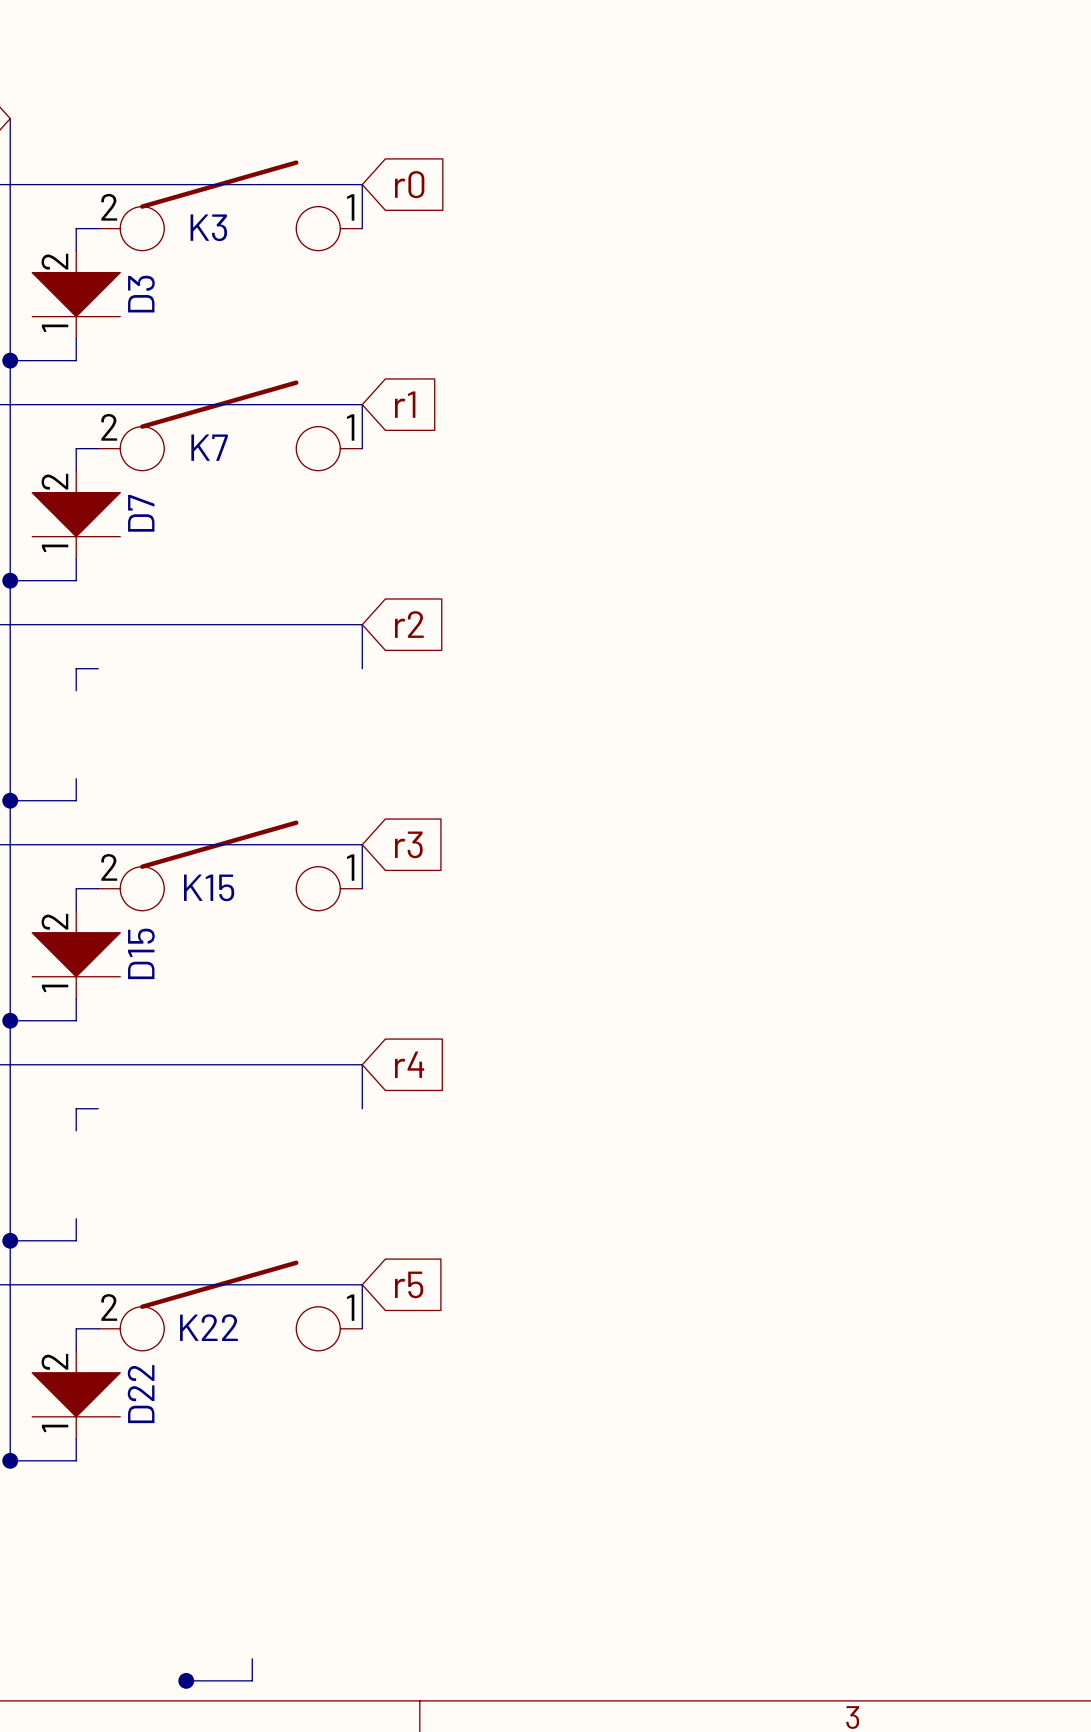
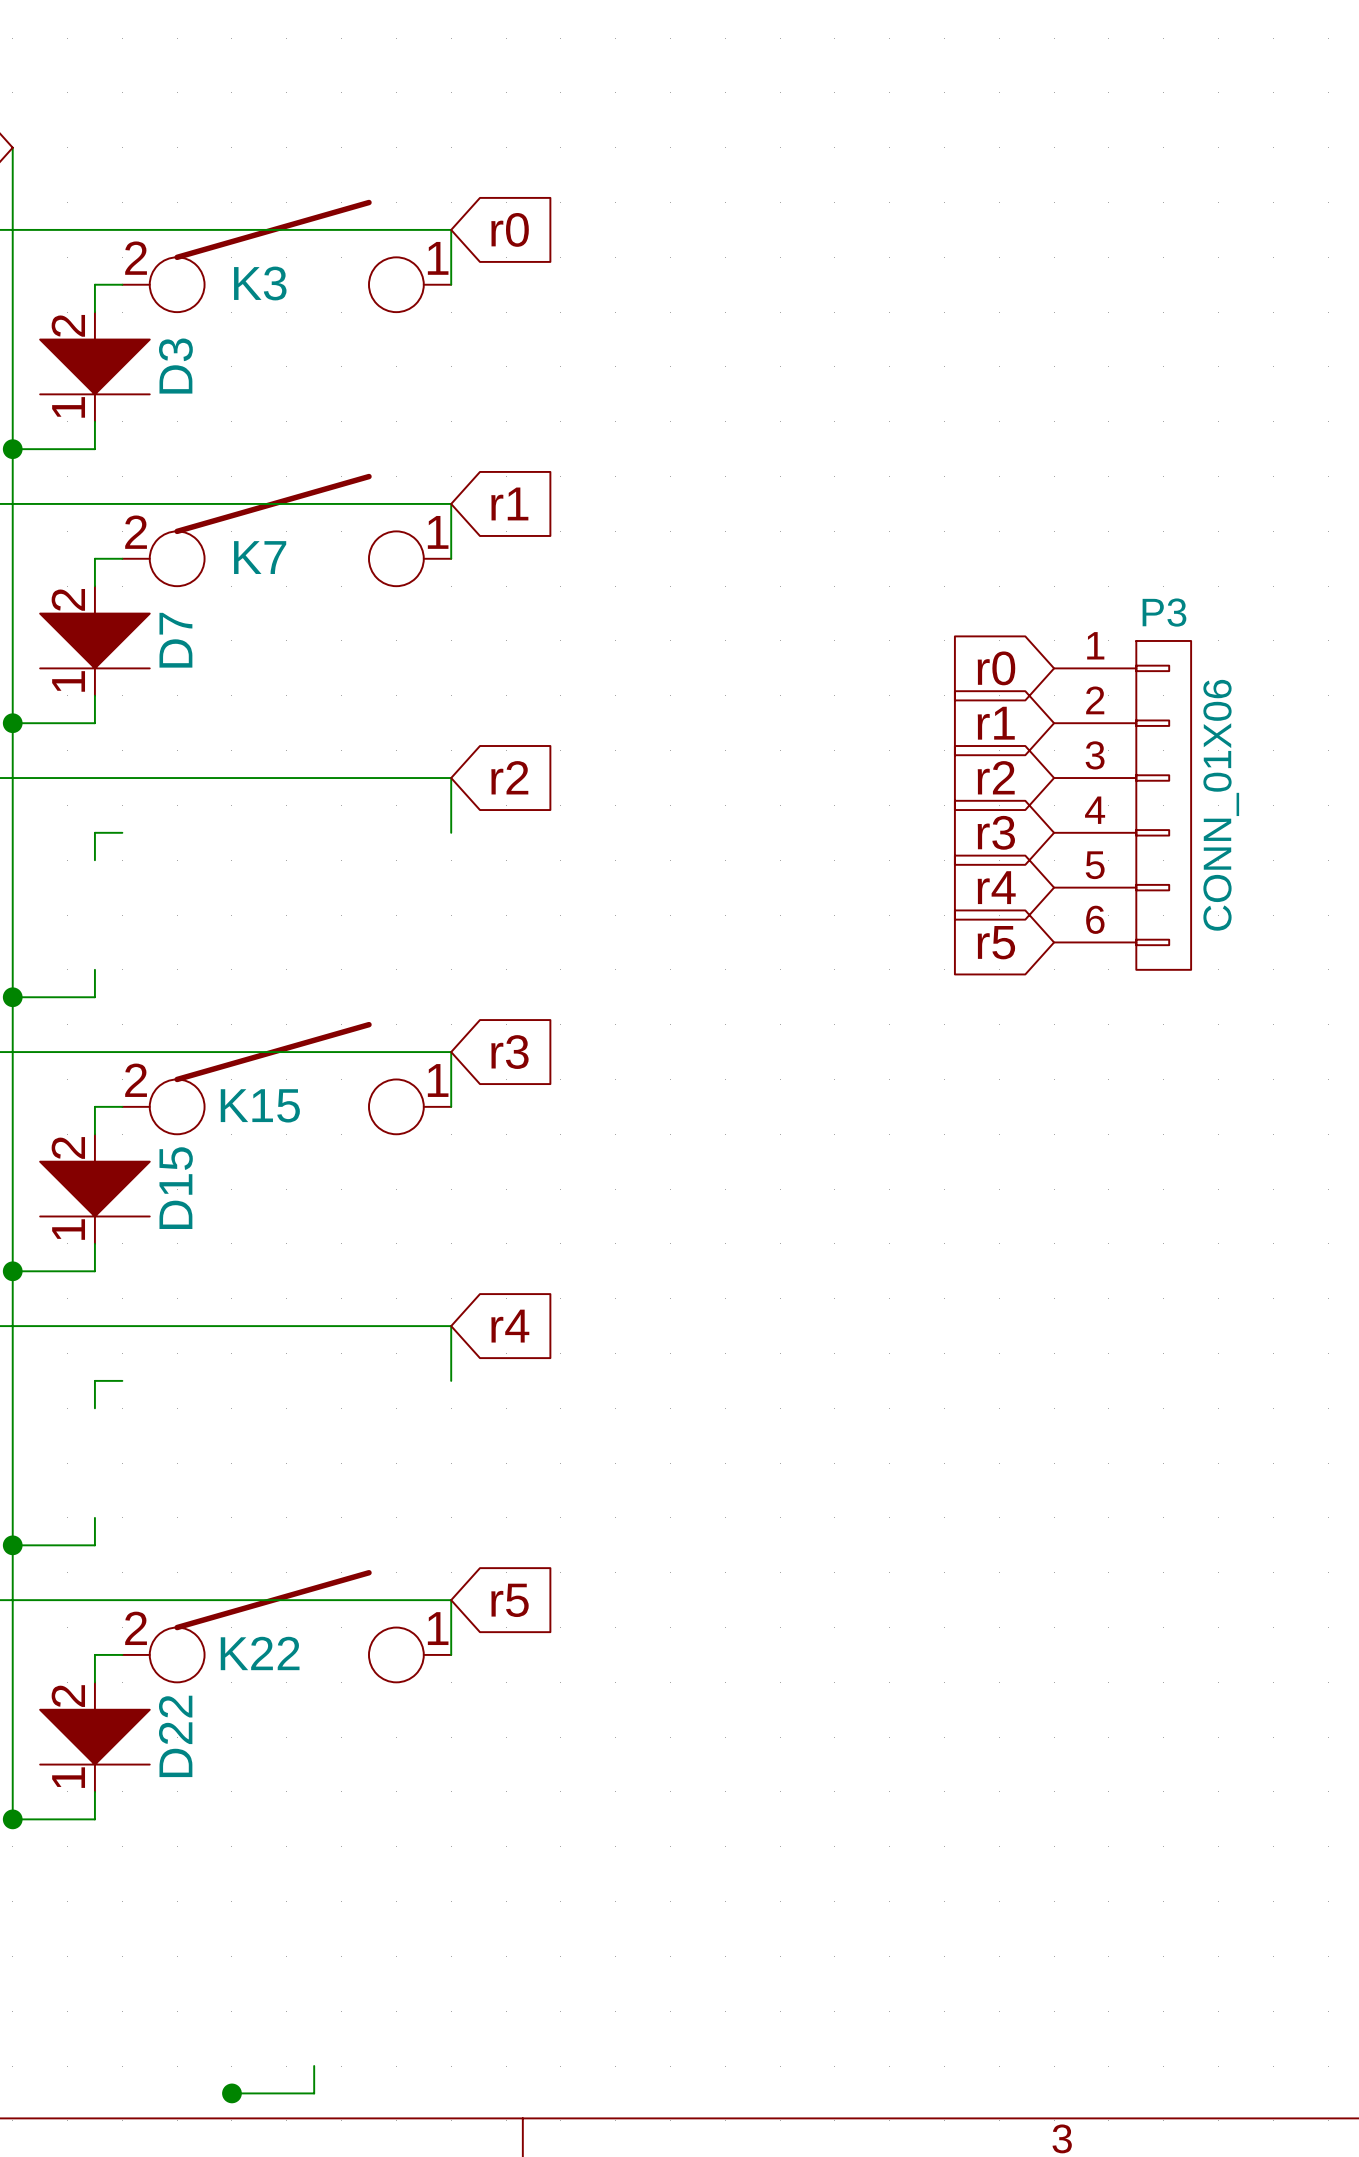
global label: none -> r0 (996, 668)
global label: none -> r1 (996, 723)
global label: none -> r2 (996, 777)
P3: none -> CONN_01X06 (1122, 805)
global label: none -> r3 (996, 832)
global label: none -> r4 (996, 887)
global label: none -> r5 (996, 942)

